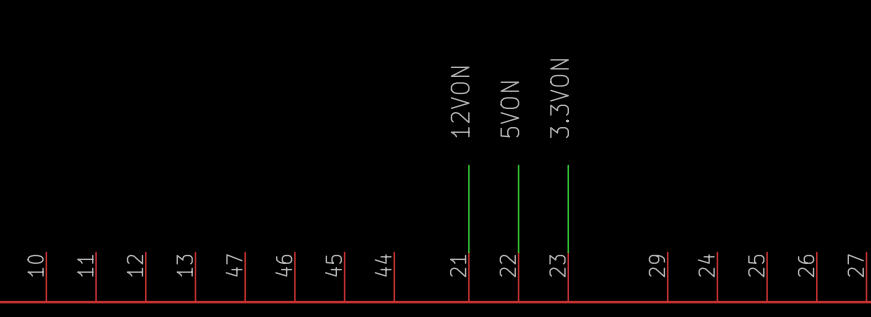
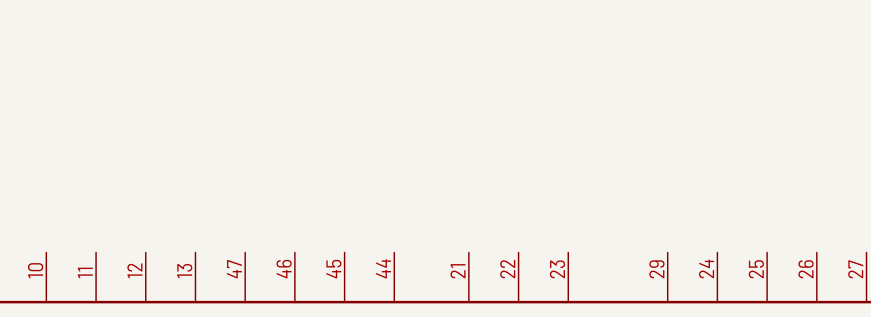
label: 3.3VON (559, 98) -> none
label: 12VON (460, 102) -> none
label: 5VON (509, 109) -> none
wire: (468, 165) (468, 252) -> none
wire: (518, 165) (518, 252) -> none
wire: (568, 165) (568, 252) -> none

